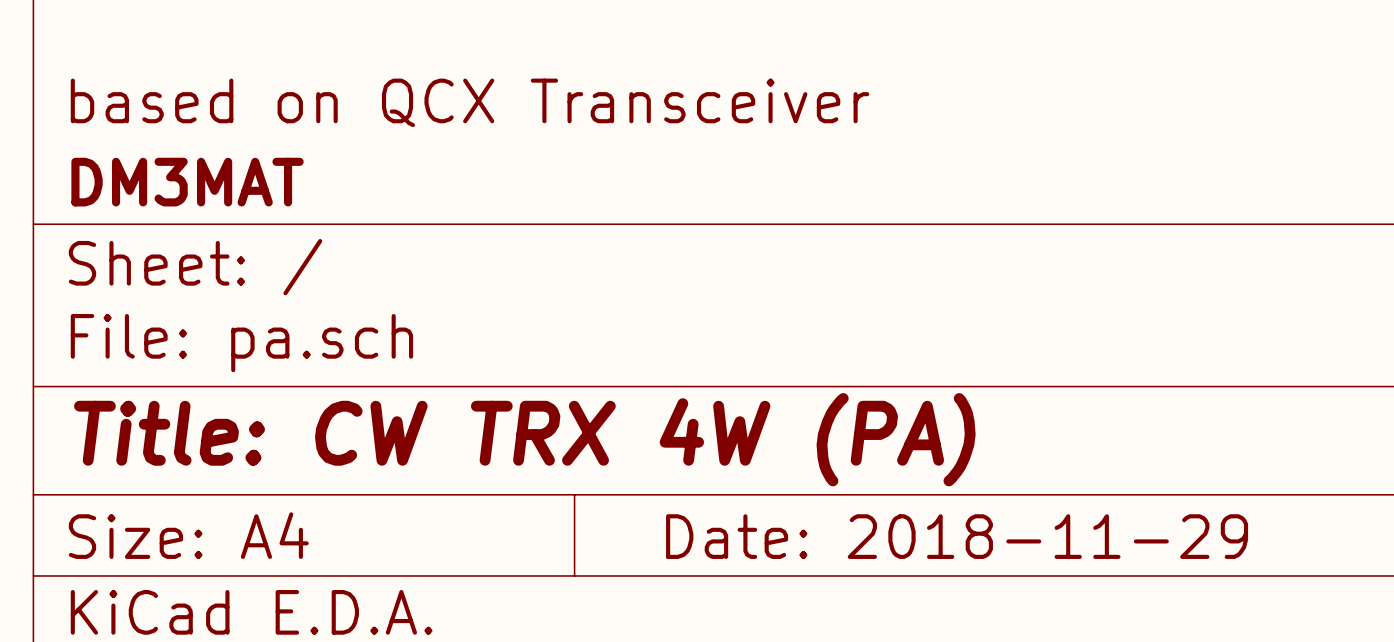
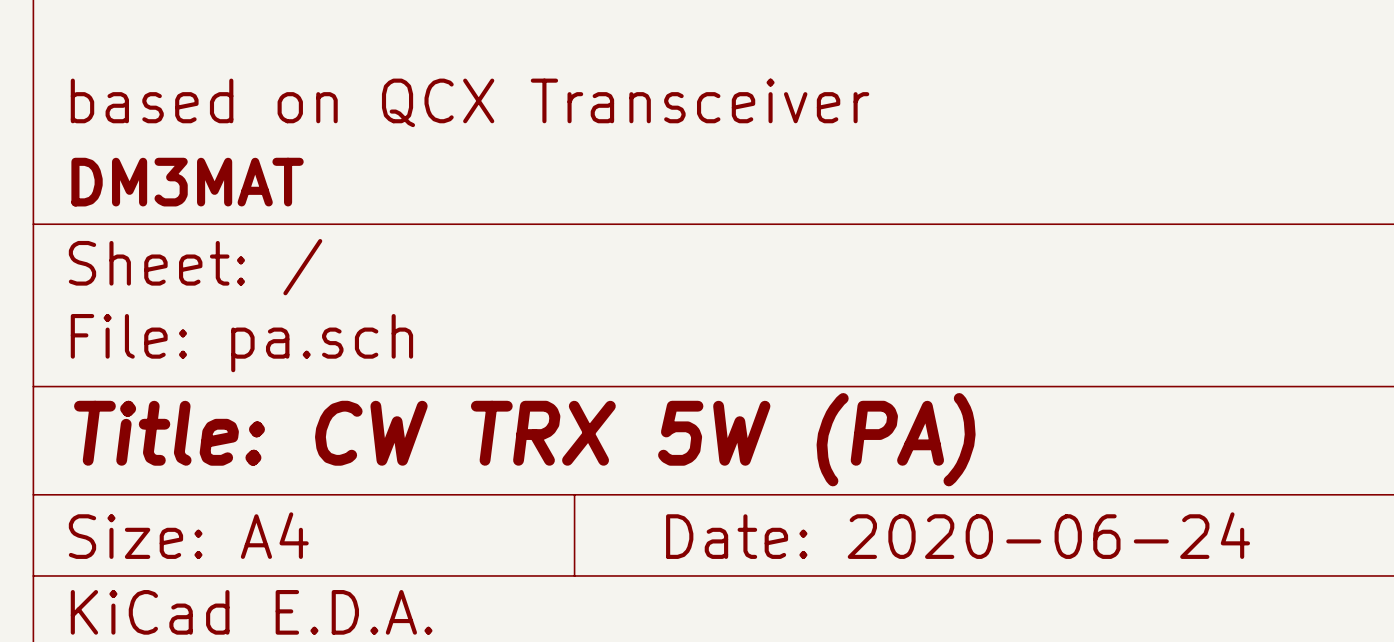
title block: Title: CW TRX 4W (PA) (524, 439) -> Title: CW TRX 5W (PA) (524, 439)
title block: Date: 2018-11-29 (957, 536) -> Date: 2020-06-24 (958, 535)

